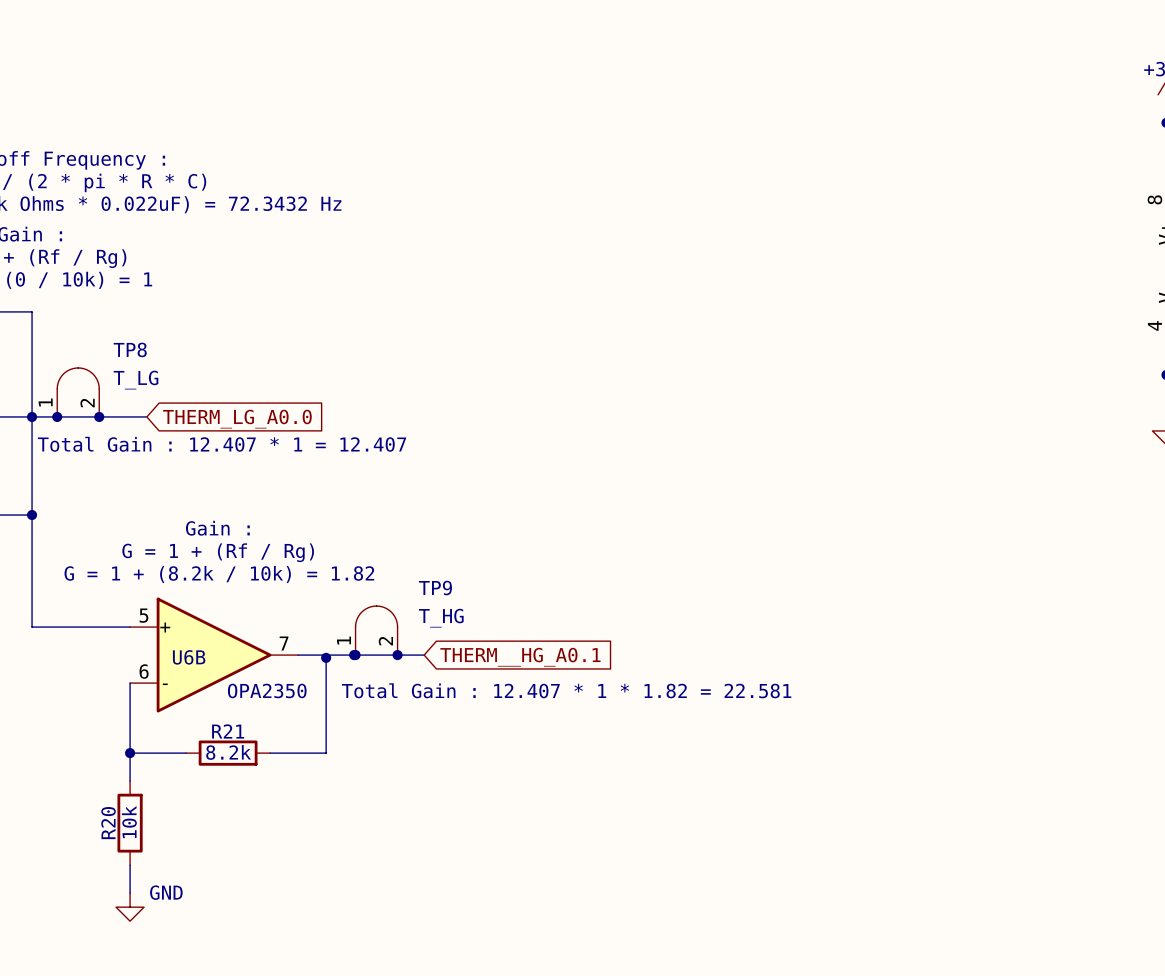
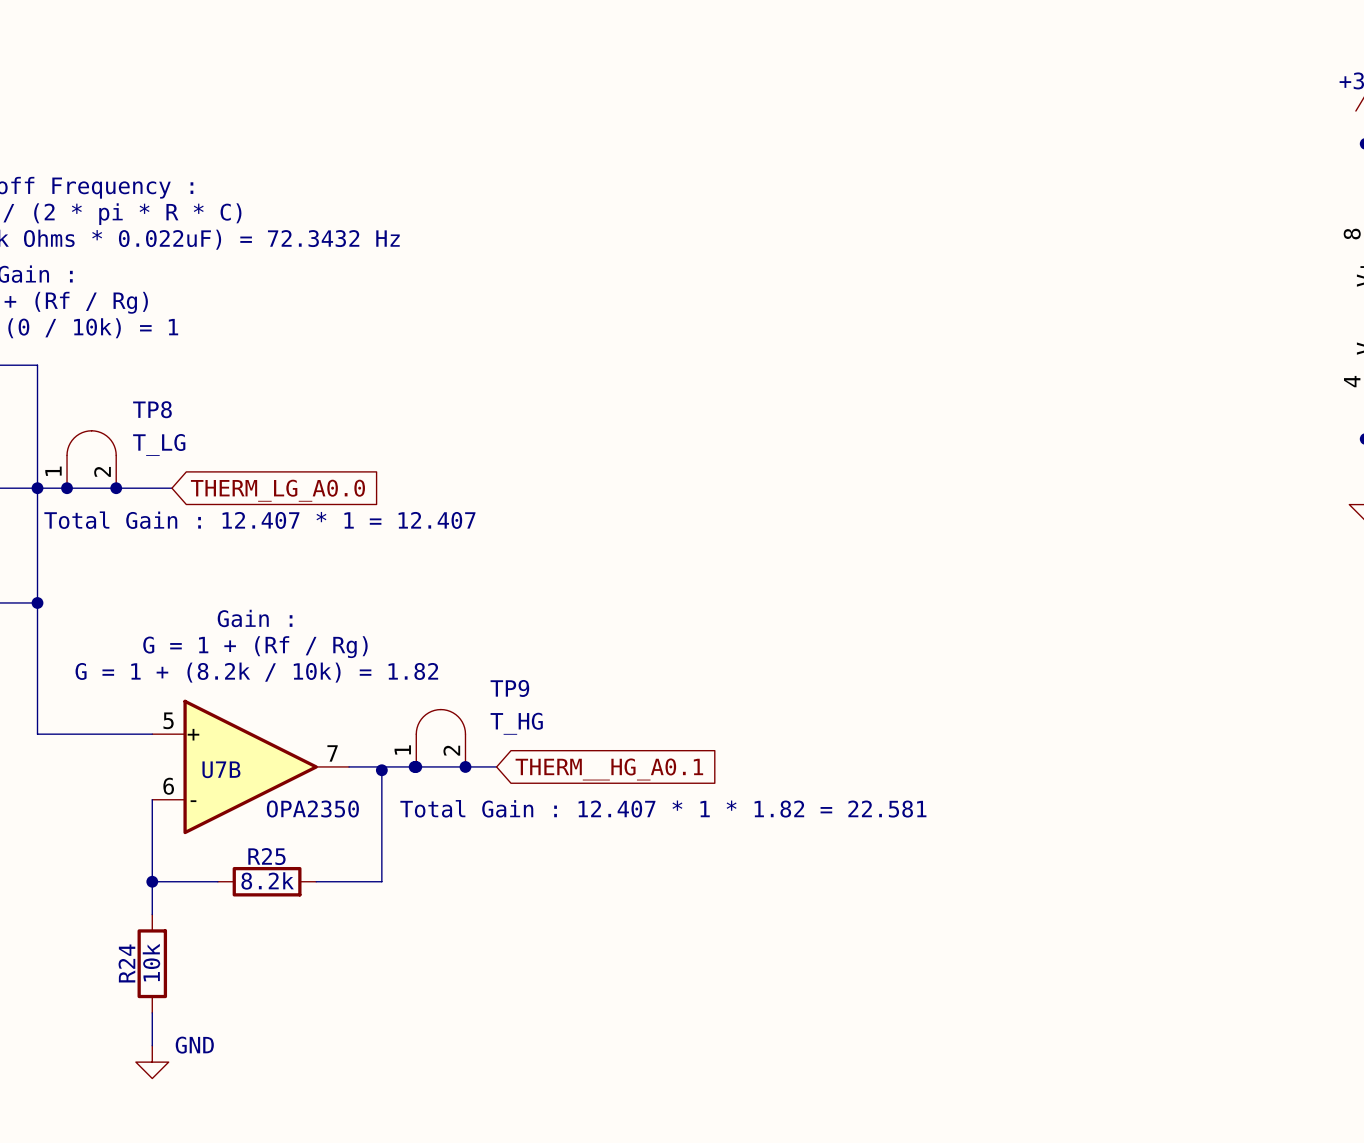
U6B name: U6B (189, 657) -> U7B (221, 769)
R21 name: R21 (228, 731) -> R25 (266, 856)
R20 name: R20 (108, 823) -> R24 (126, 963)

